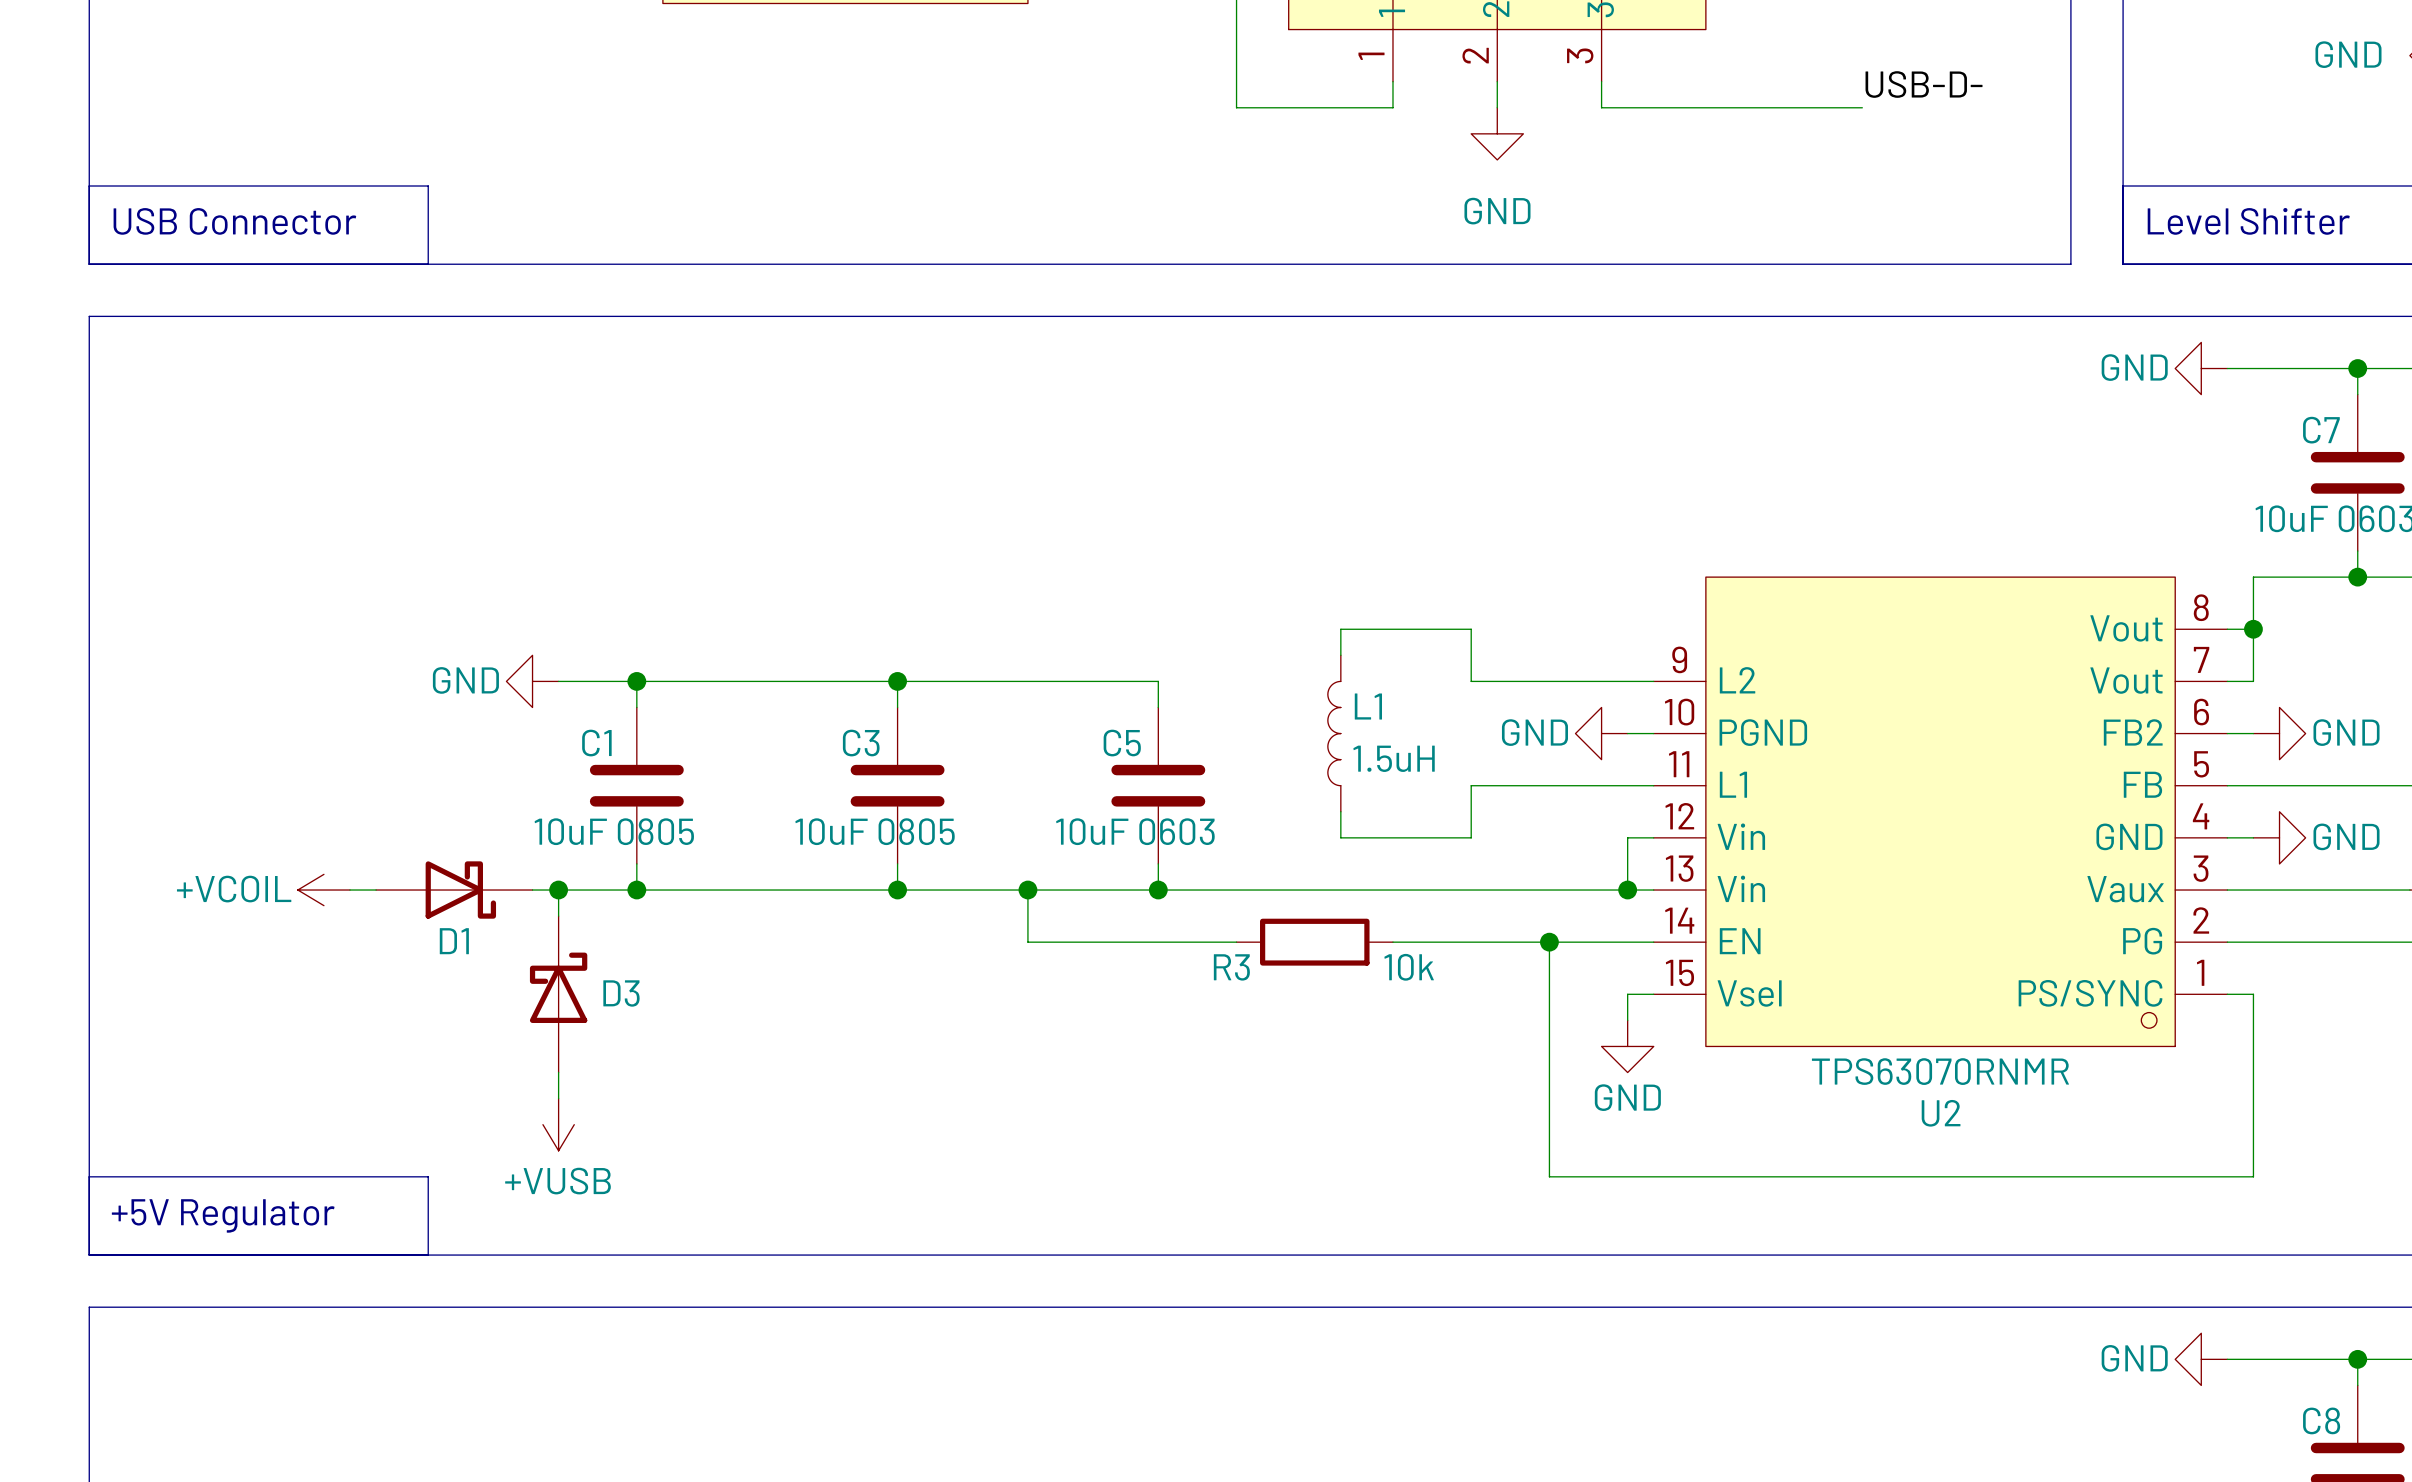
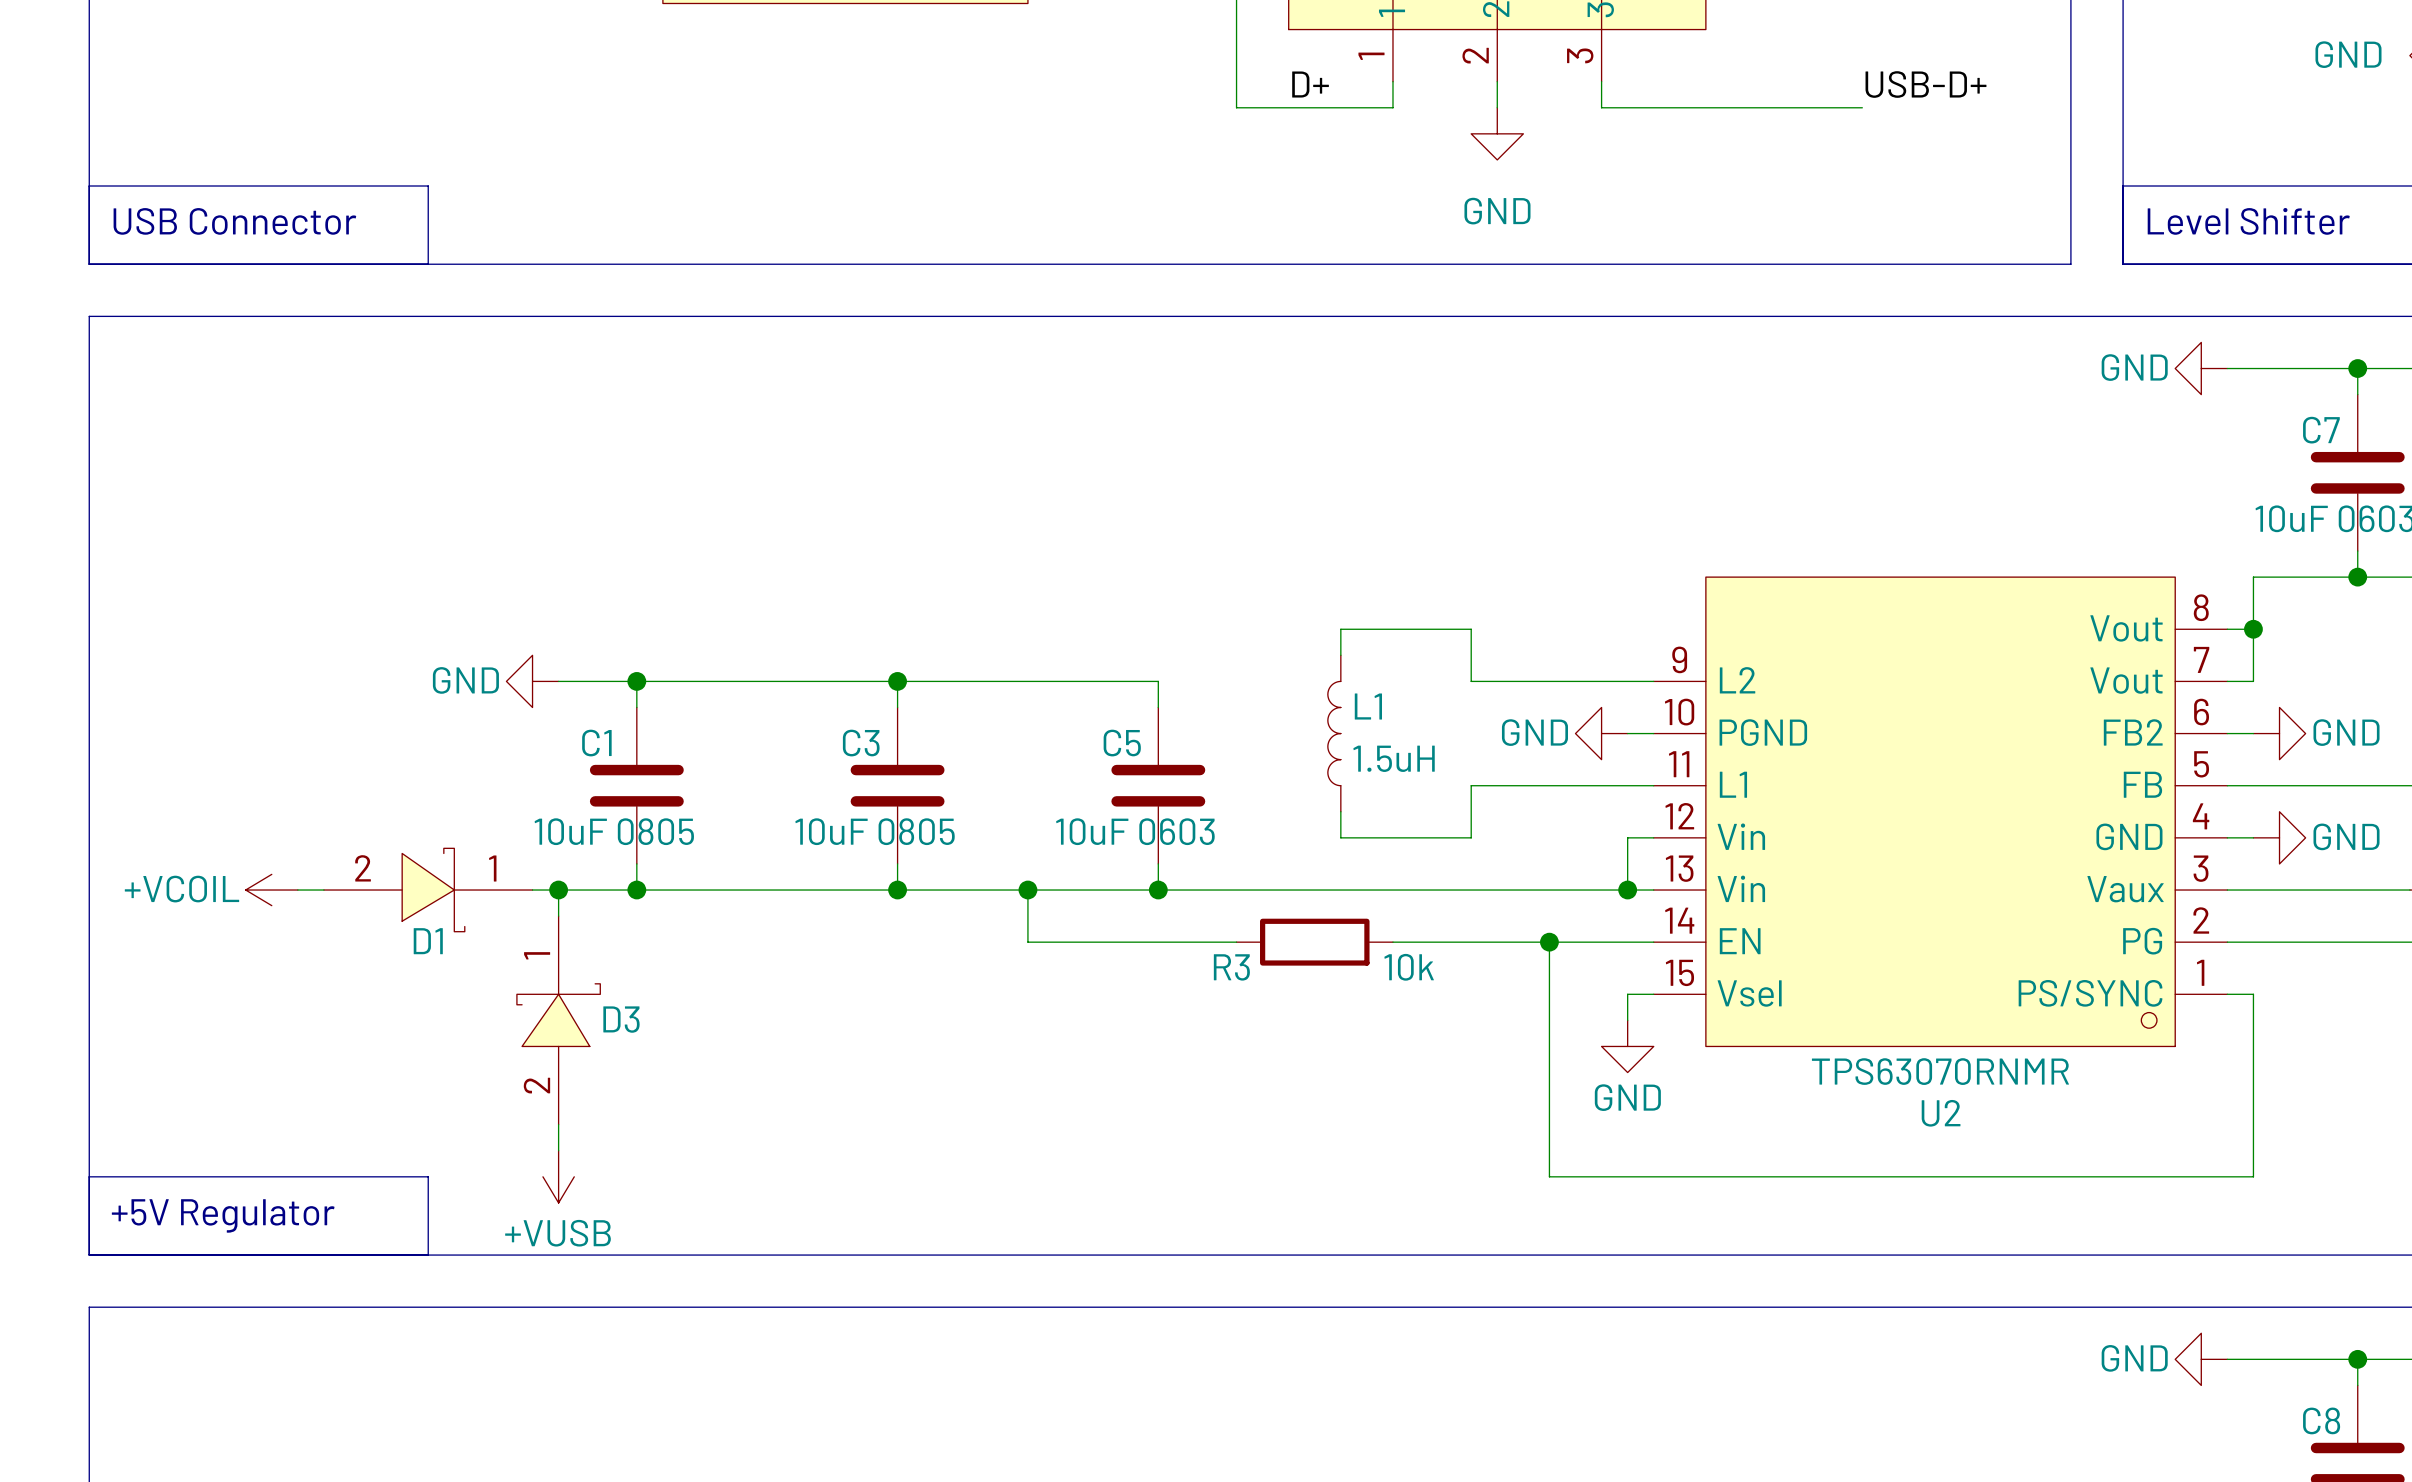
label: none -> D+ (1310, 84)
label: USB-D- (1924, 84) -> USB-D+ (1925, 84)
D1 symbol: [376, 861, 533, 919] -> [323, 848, 533, 932]
power symbol position: +VCOIL (323, 890) -> +VCOIL (271, 890)
D3 symbol: [529, 916, 588, 1073] -> [516, 916, 601, 1125]
power symbol position: +VUSB (558, 1124) -> +VUSB (558, 1176)

